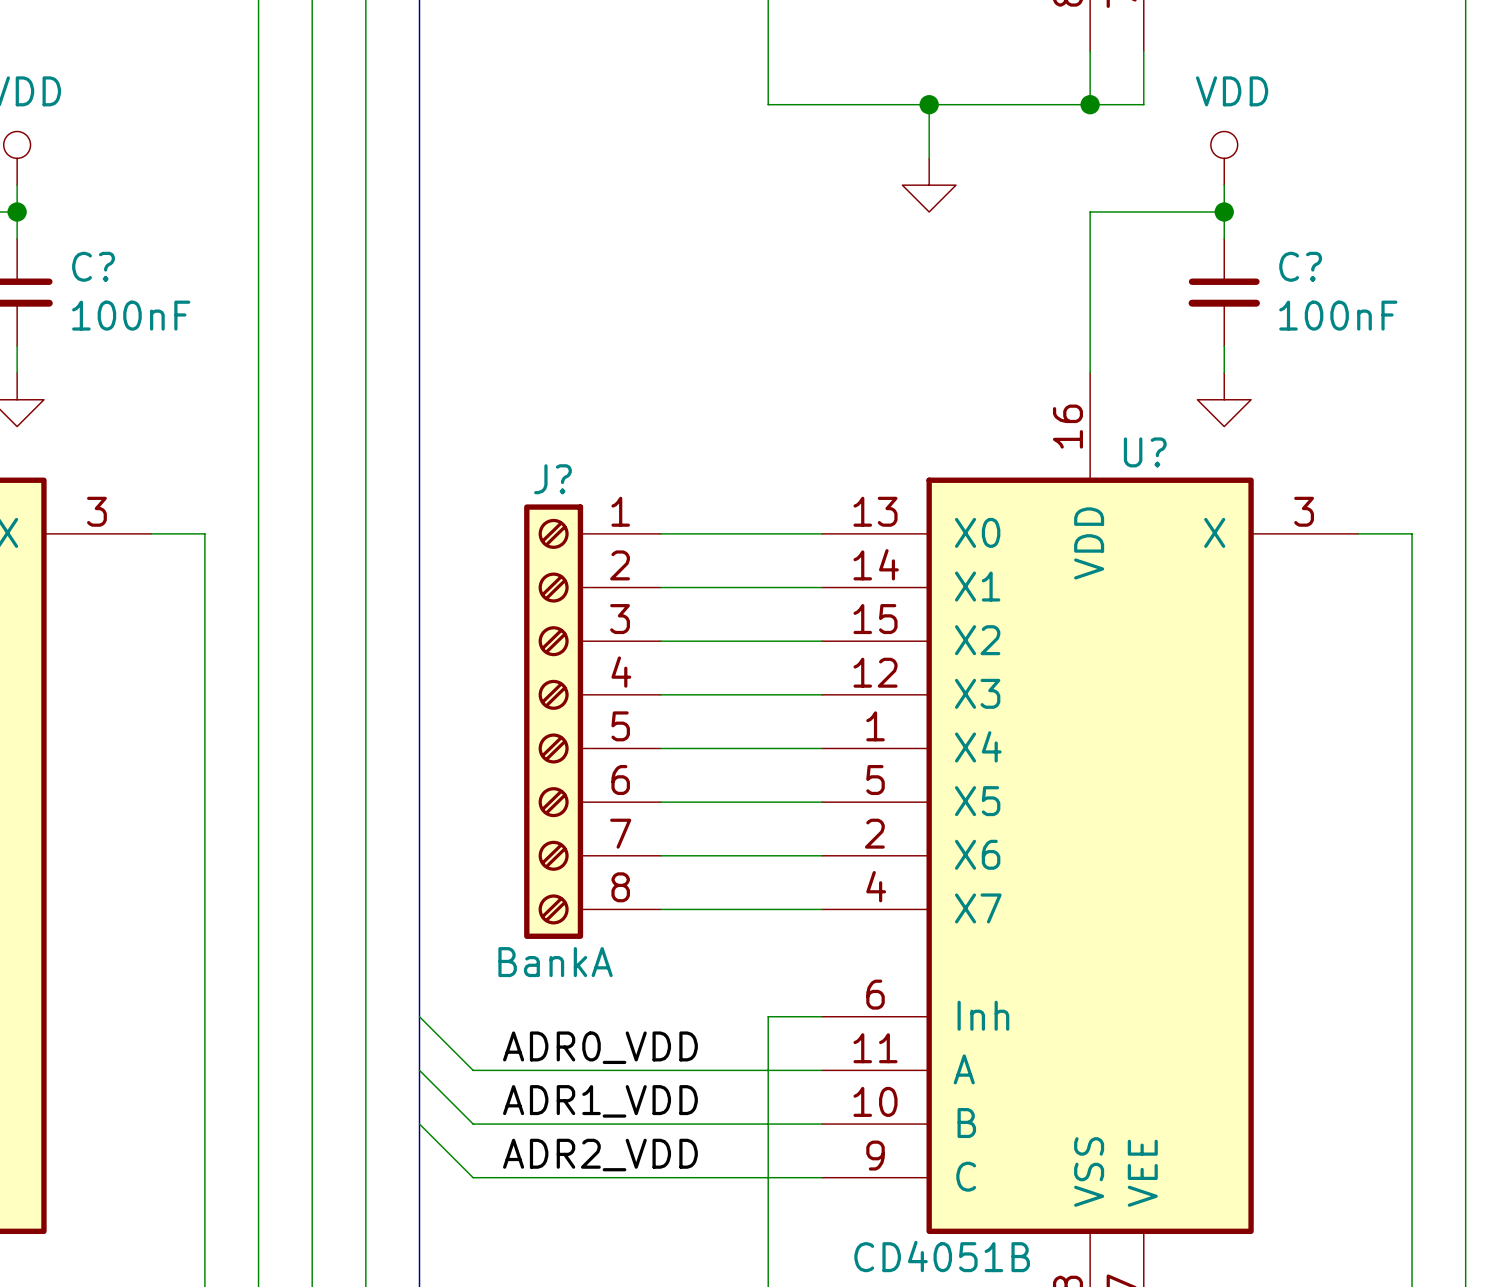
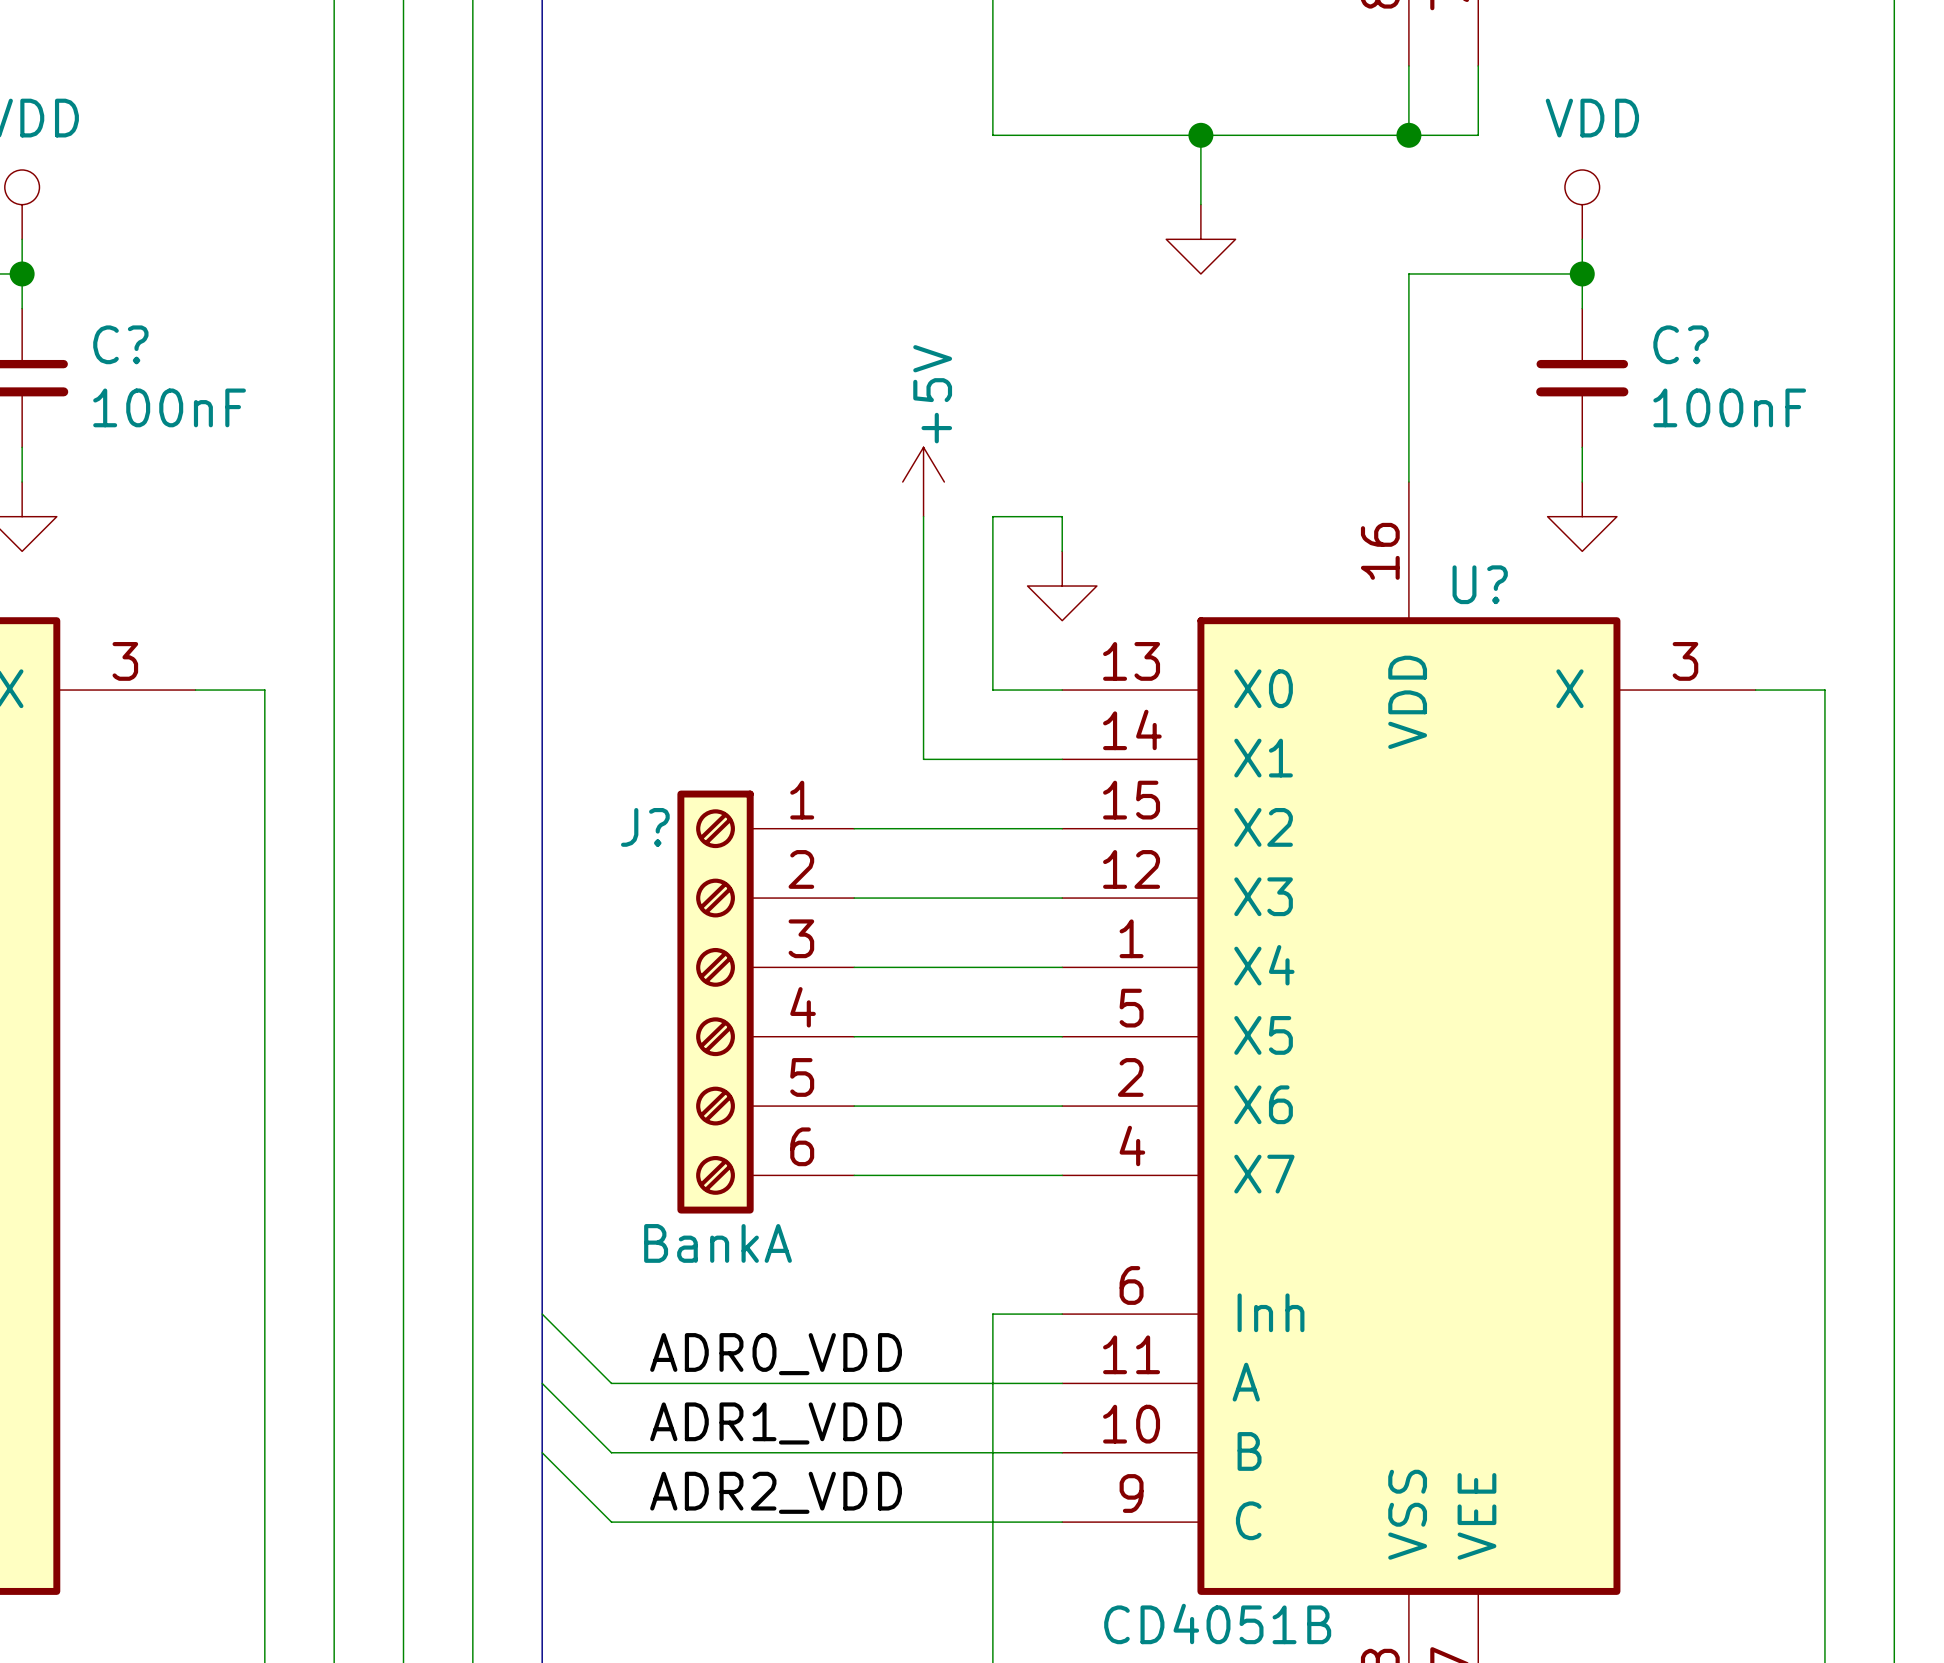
power symbol: none -> +5V (923, 482)
power symbol: none -> (1062, 586)
wire: (660, 533) (768, 533) -> (1062, 551) (1062, 516) (992, 516) (992, 690)
wire: (660, 587) (714, 587) -> (923, 516) (923, 759)
J?: BankA (592, 721) -> none
J?: none -> BankA (765, 1002)

